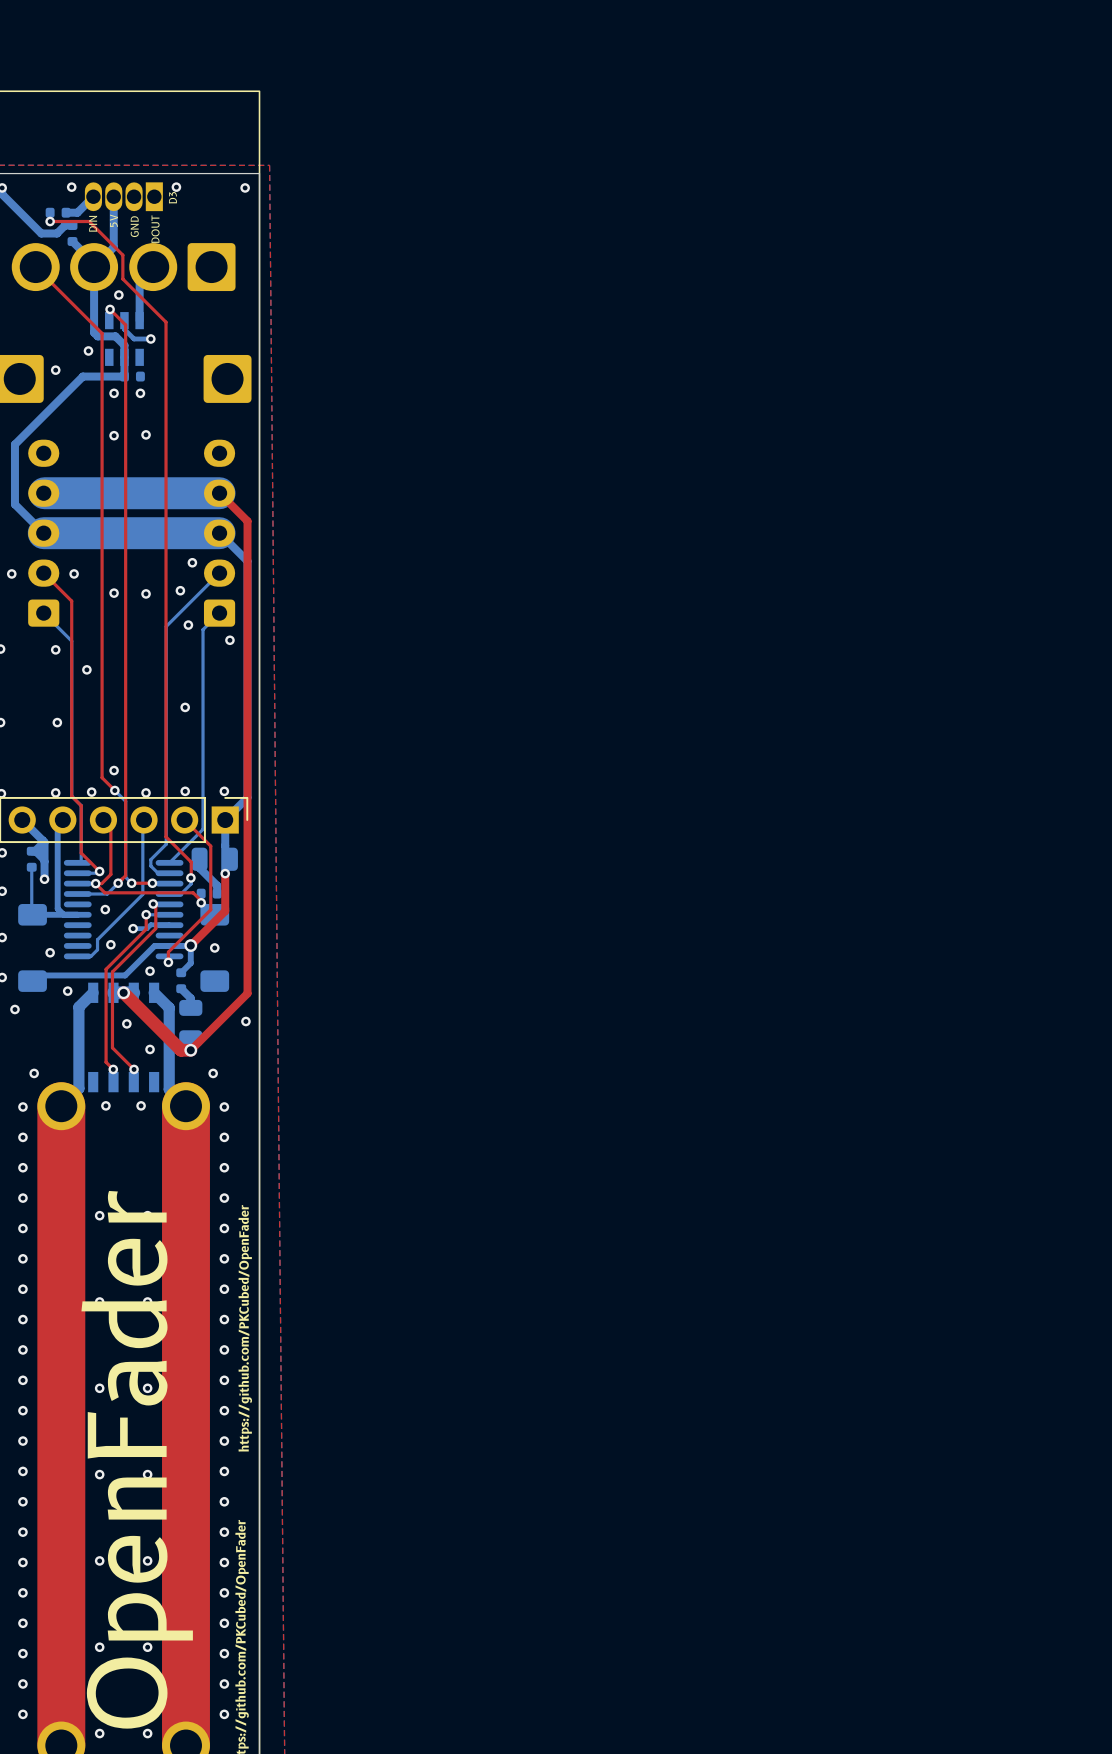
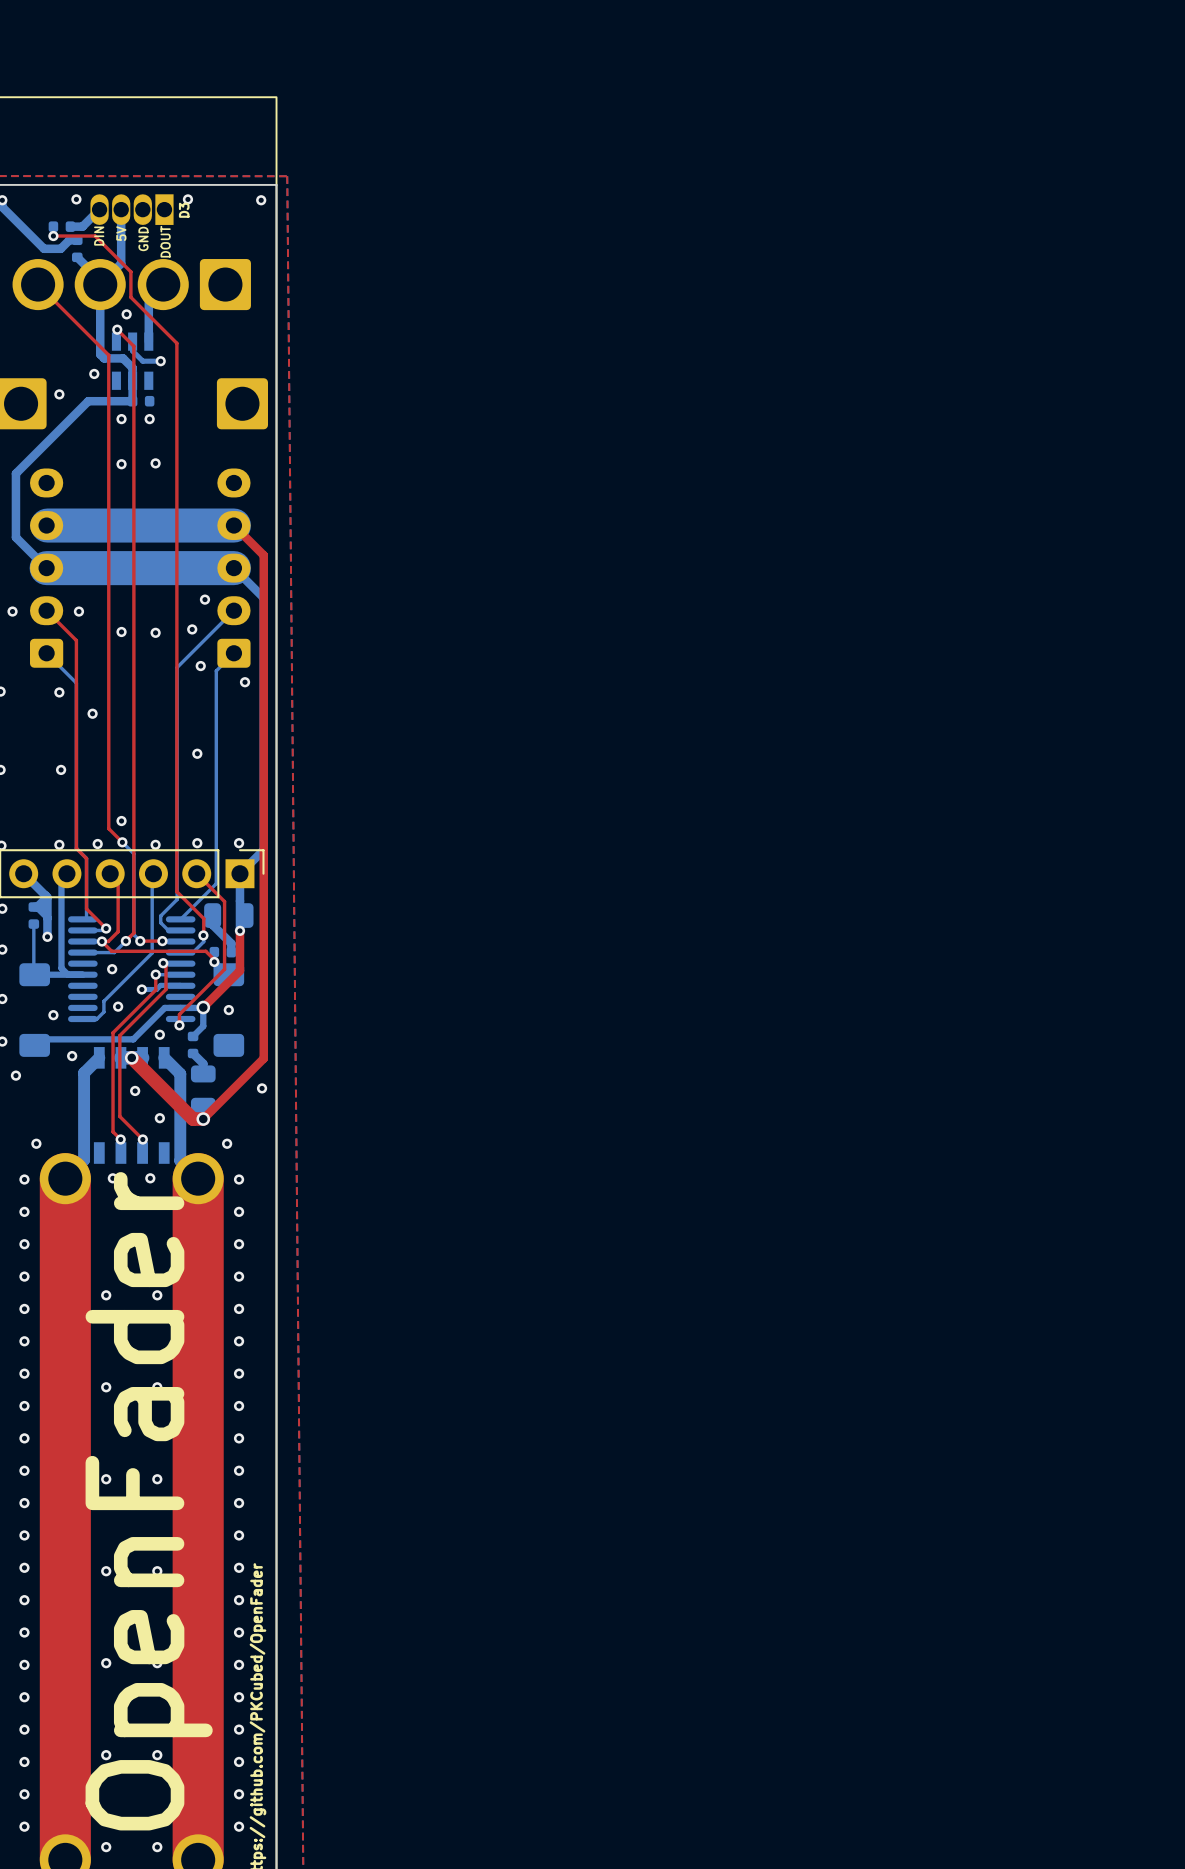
text: https://github.com/PKCubed/OpenFader (245, 1328) -> none

